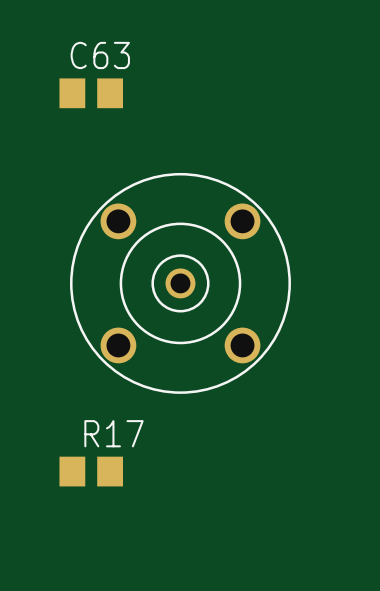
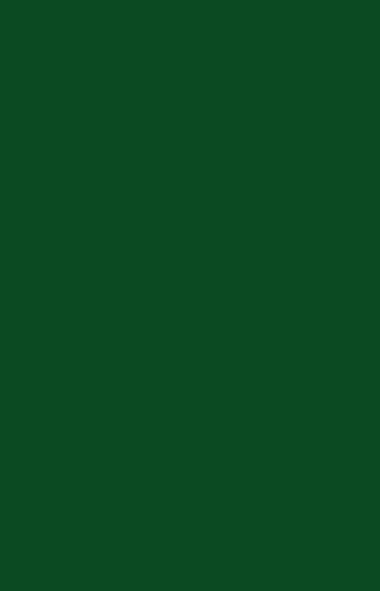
C63: (91, 93) -> none
part: (180, 283) -> none
R17: (91, 471) -> none

